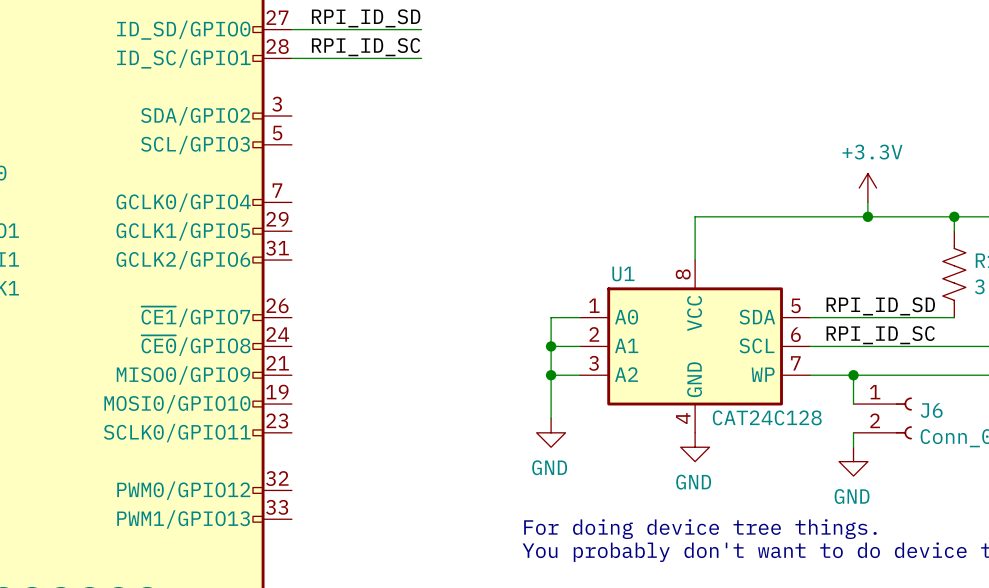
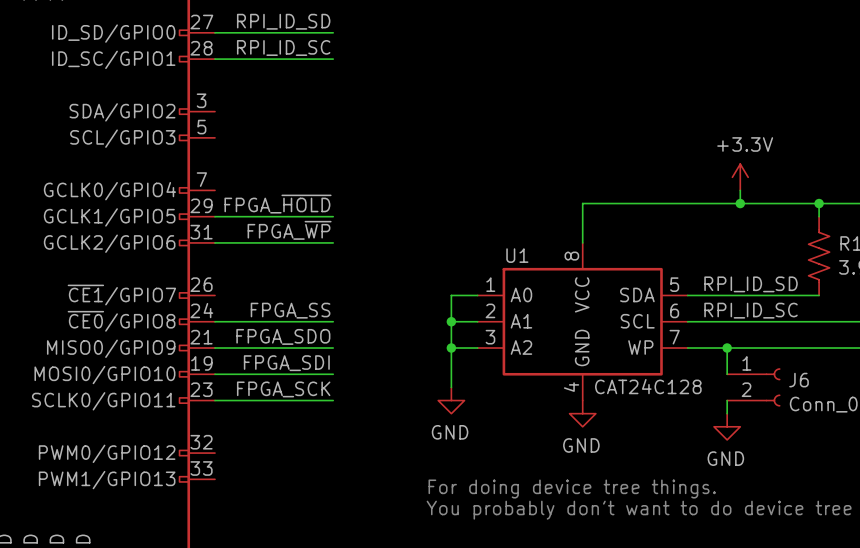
label: none -> FPGA_~{HOLD} (278, 204)
wire: none -> (214, 216) (333, 216)
label: none -> FPGA_~{WP} (289, 230)
wire: none -> (214, 242) (333, 242)
label: none -> FPGA_SS (290, 310)
wire: none -> (214, 321) (333, 321)
label: none -> FPGA_SDO (283, 336)
wire: none -> (214, 348) (333, 348)
label: none -> FPGA_SDI (286, 363)
wire: none -> (214, 374) (333, 374)
label: none -> FPGA_SCK (283, 389)
wire: none -> (214, 400) (333, 400)

